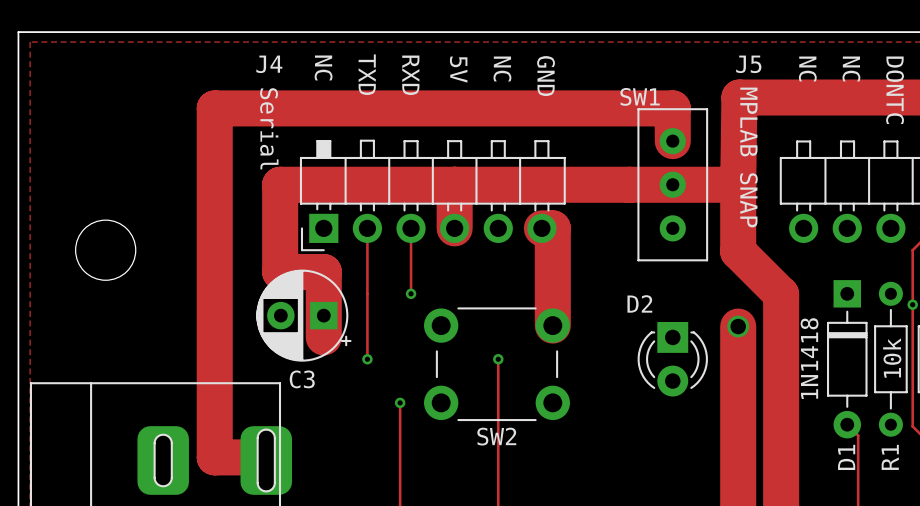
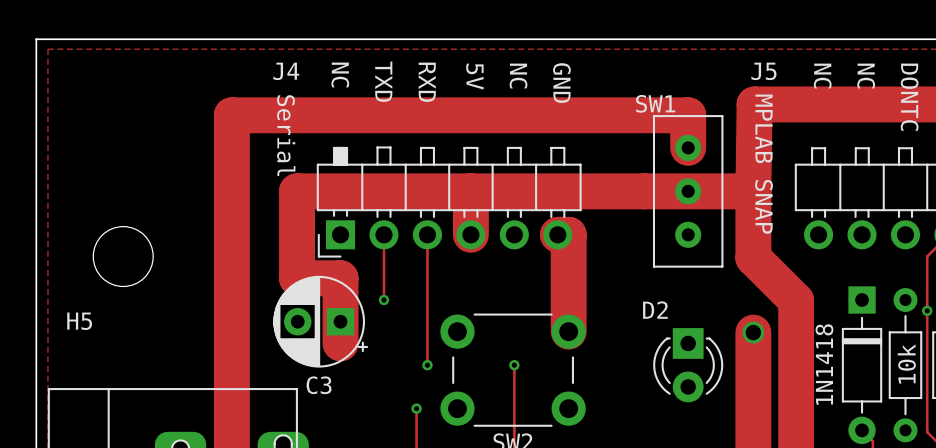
track: (367, 293) (367, 359) -> (427, 300) (427, 365)
via: none -> (383, 300)
via: (411, 293) -> none
H5 name: none -> H5 (79, 321)
via: (367, 359) -> none
via: none -> (427, 365)

